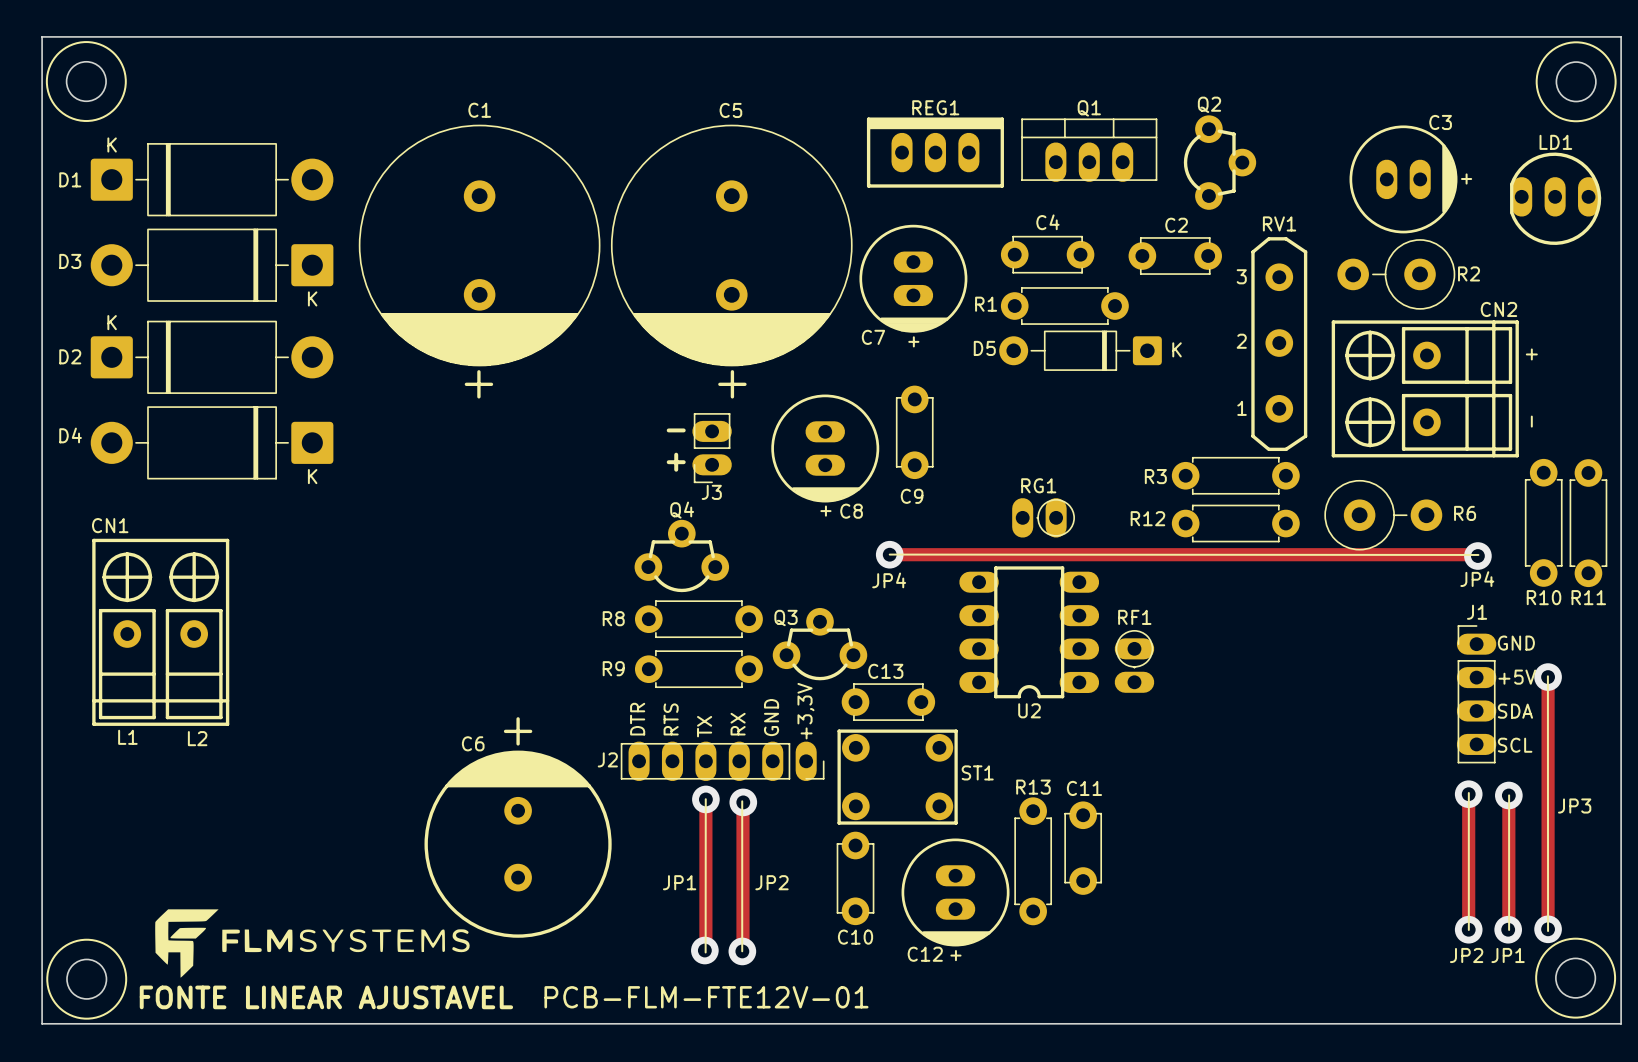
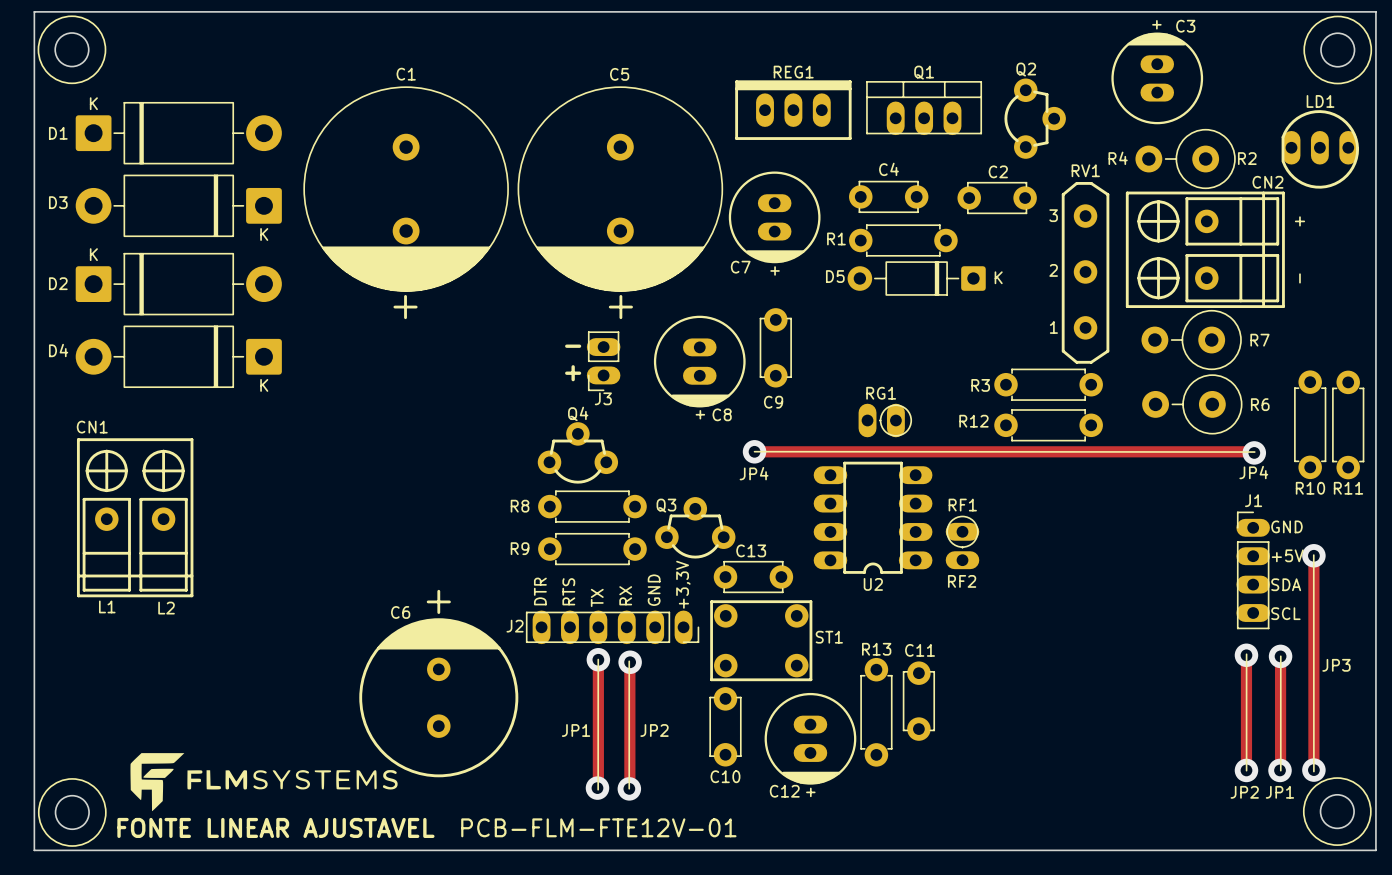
C3 rotation: 0° (1403, 179) -> 90° counterclockwise (1157, 78)
C3 position: (1403, 179) -> (1157, 78)
text: none -> R4 (1118, 158)
R2 position: (1396, 274) -> (1185, 159)
text: none -> + (1299, 221)
text: + (1531, 354) -> - (1299, 278)
CN2 position: (1425, 388) -> (1205, 249)
text: - (1531, 421) -> none
R7: none -> (1191, 340)
R6 rotation: 0° (1383, 515) -> 180° (1192, 404)
text: none -> RF2 (962, 581)

